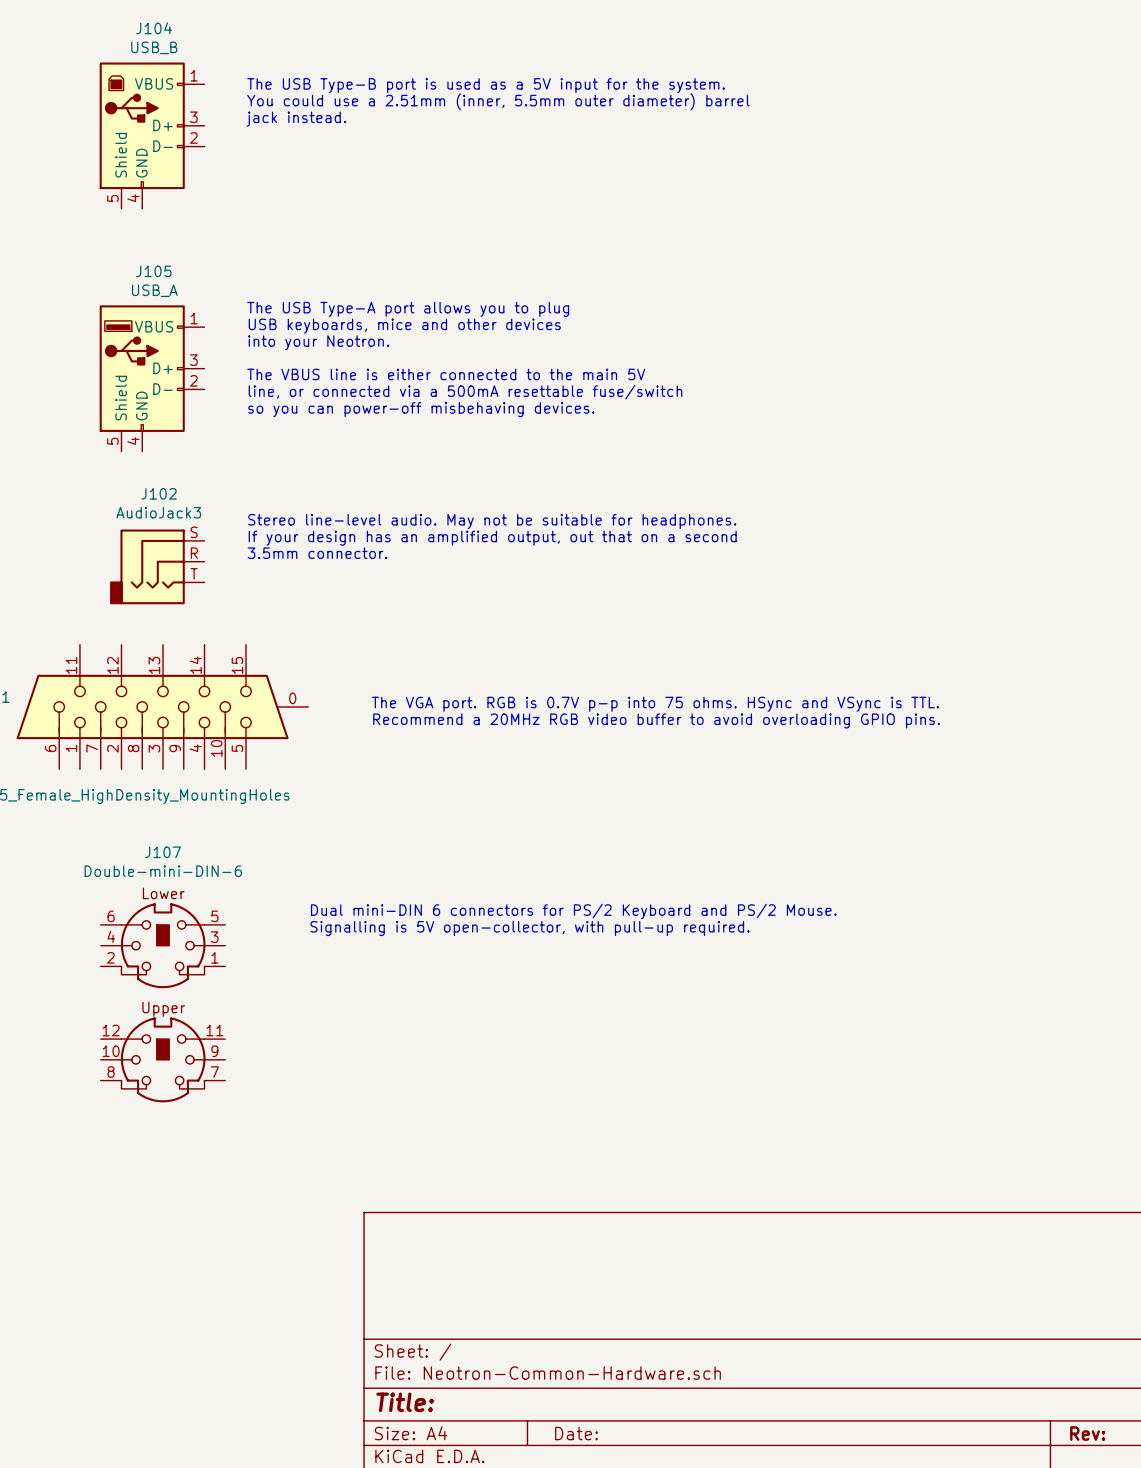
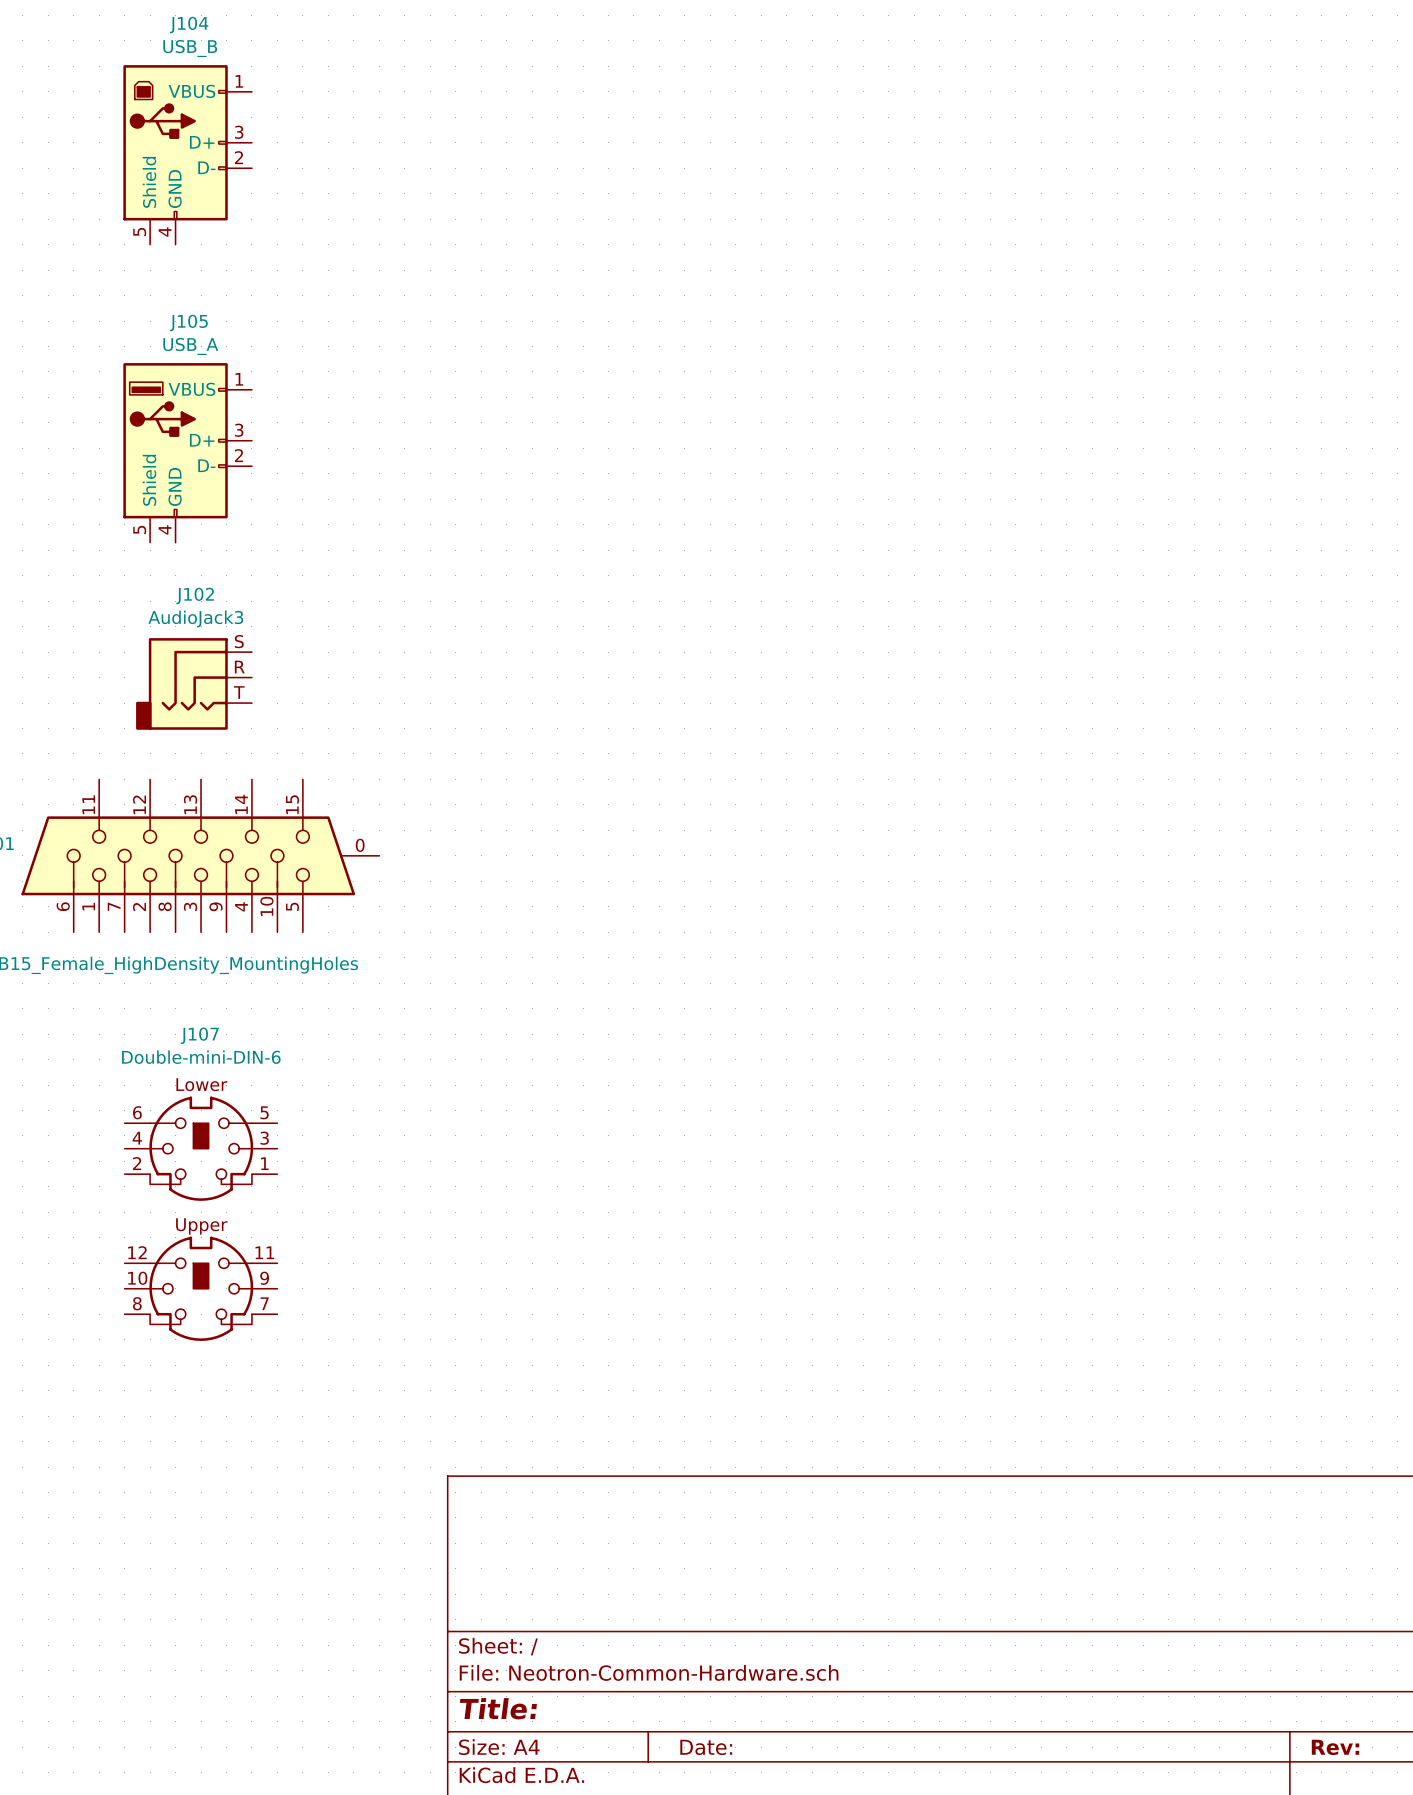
text: The USB Type-B port is used as a 5V input for the system. (486, 85) -> none
text: You could use a 2.51mm (inner, 5.5mm outer diameter) barrel (498, 101) -> none
text: jack instead. (296, 119) -> none
text: The USB Type-A port allows you to plug (408, 309) -> none
text: USB keyboards, mice and other devices (404, 326) -> none
text: into your Neotron. (318, 342) -> none
text: The VBUS line is either connected to the main 5V (446, 374) -> none
text: line, or connected via a 500mA resettable fuse/switch (465, 392) -> none
text: so you can power-off misbehaving devices. (421, 409) -> none
text: Stereo line-level audio. May not be suitable for headphones. (492, 521) -> none
text: If your design has an amplified output, out that on a second (492, 538) -> none
text: 3.5mm connector. (317, 553) -> none
text: The VGA port. RGB is 0.7V p-p into 75 ohms. HSync and VSync is TTL. (655, 704) -> none
text: Recommend a 20MHz RGB video buffer to avoid overloading GPIO pins. (656, 720) -> none
text: Dual mini-DIN 6 connectors for PS/2 Keyboard and PS/2 Mouse. (573, 911) -> none
text: Signalling is 5V open-collector, with pull-up required. (530, 928) -> none

